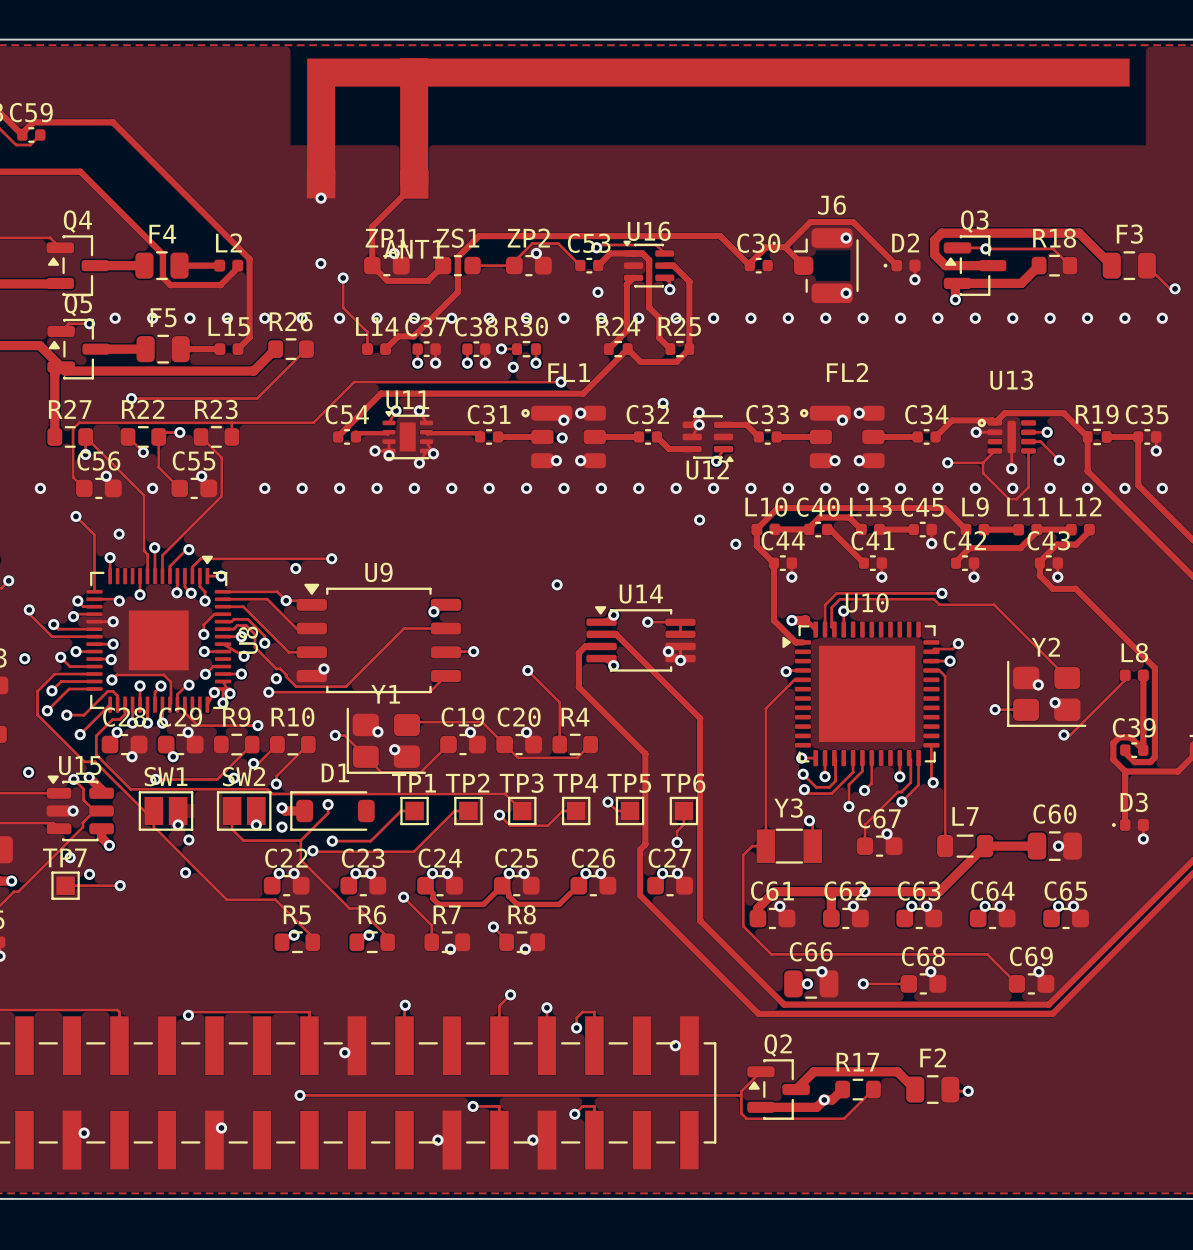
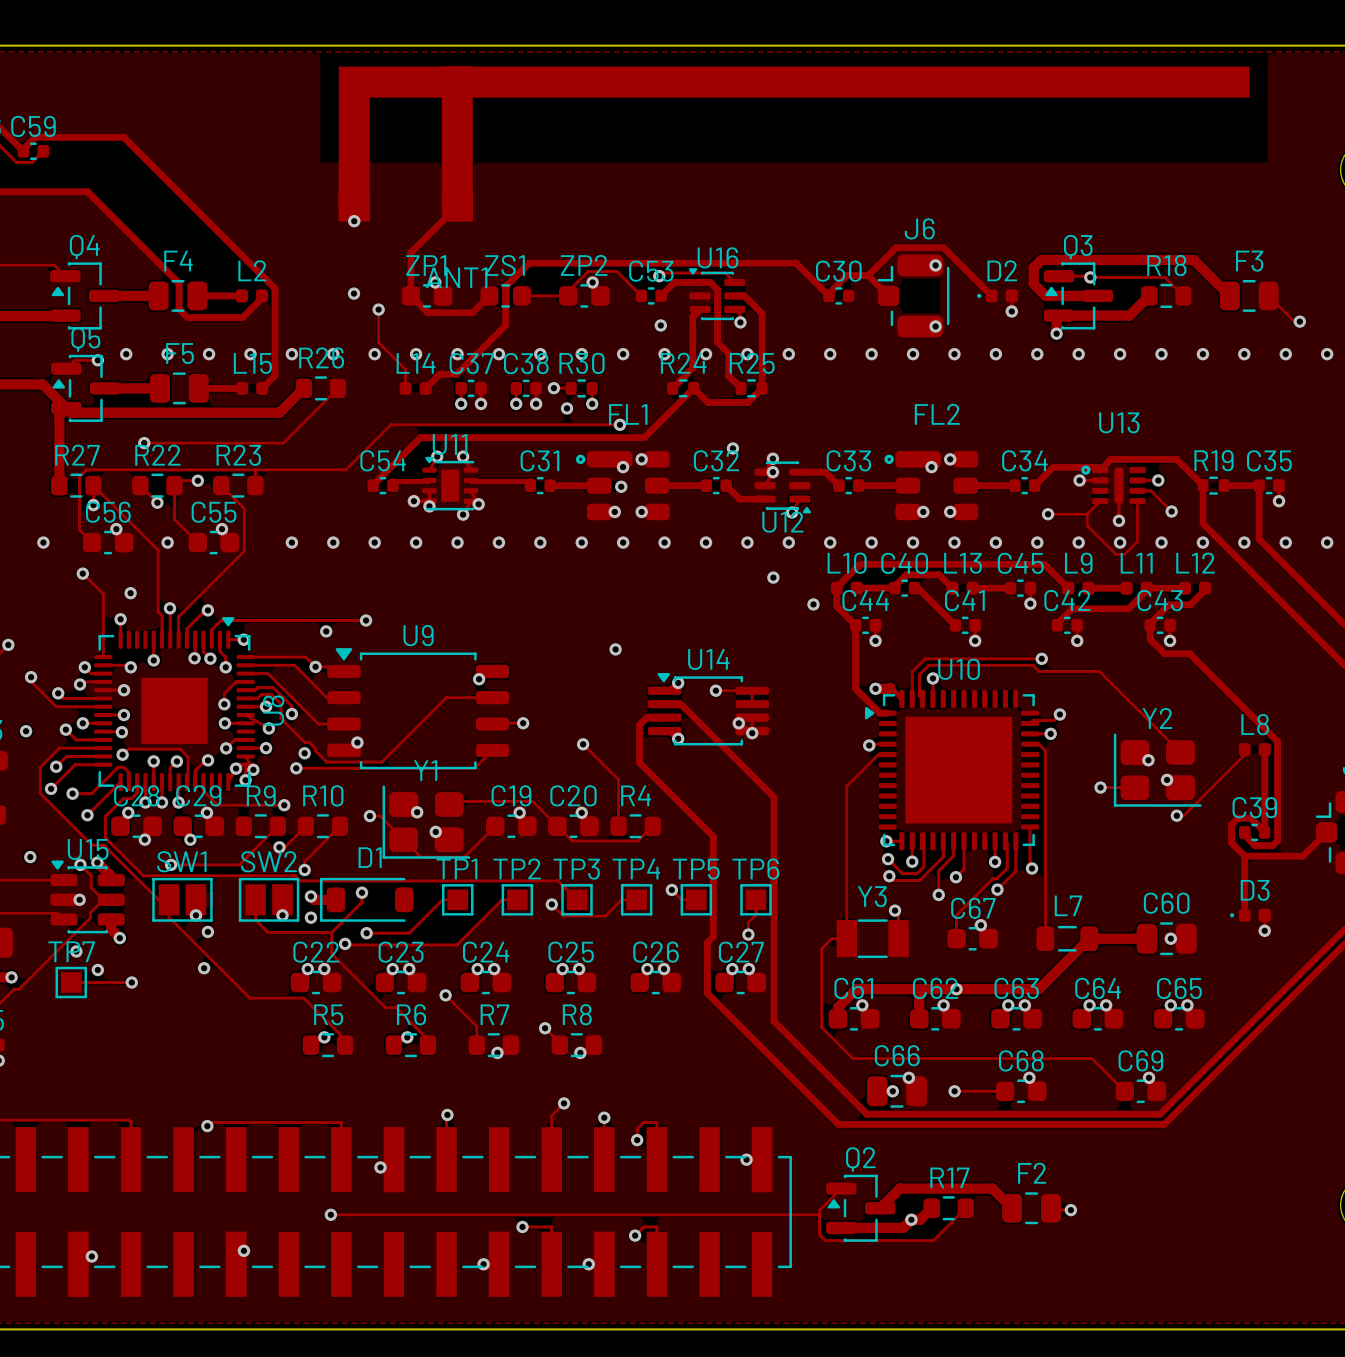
via: (233, 778) -> none
track: (433, 893) (433, 898) (438, 904) (483, 904) (494, 893) -> none
track: (508, 893) (508, 896) (517, 904) (559, 904) (570, 893) -> none

